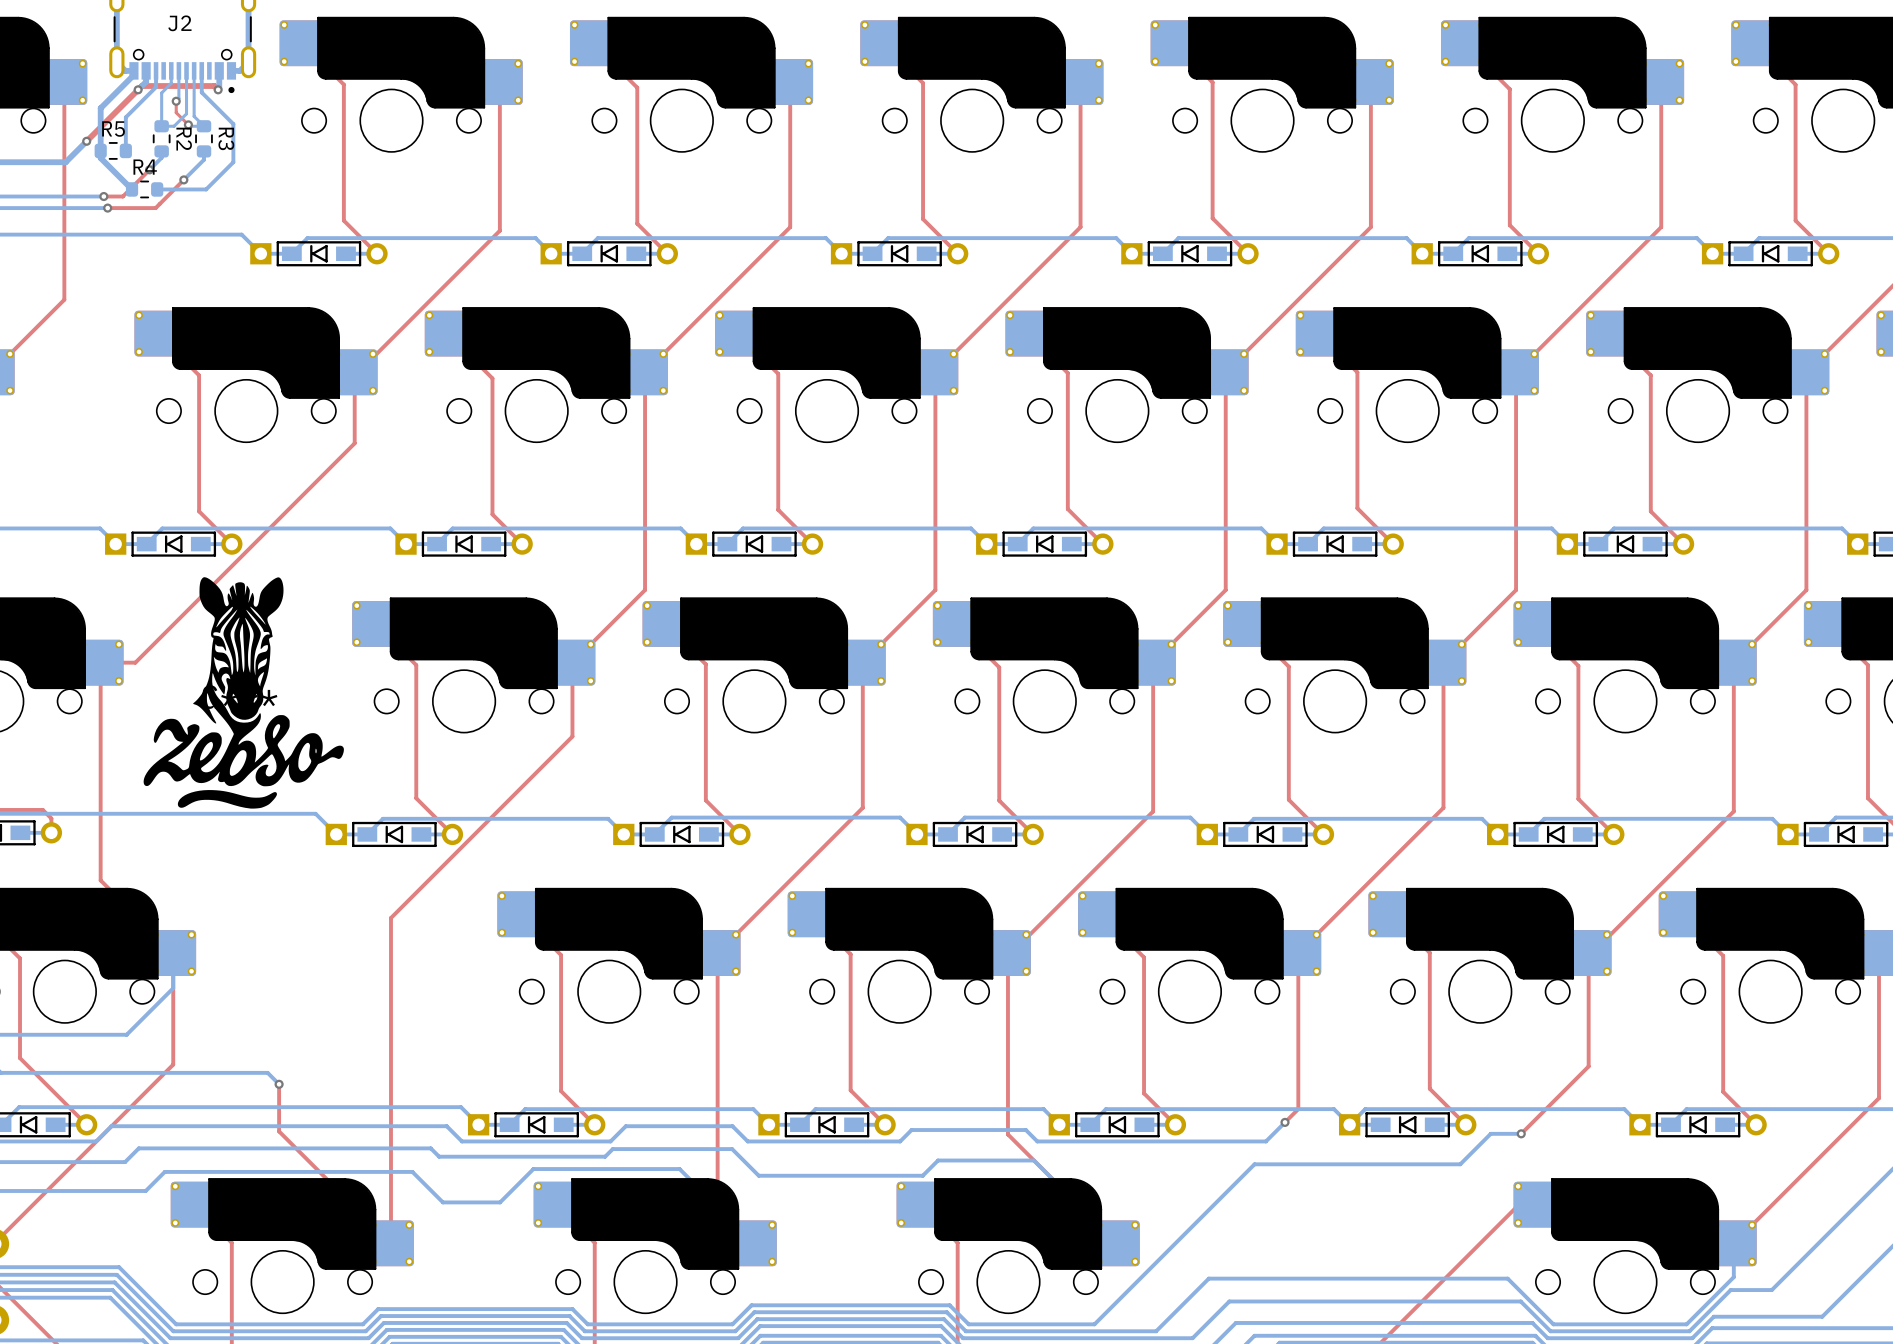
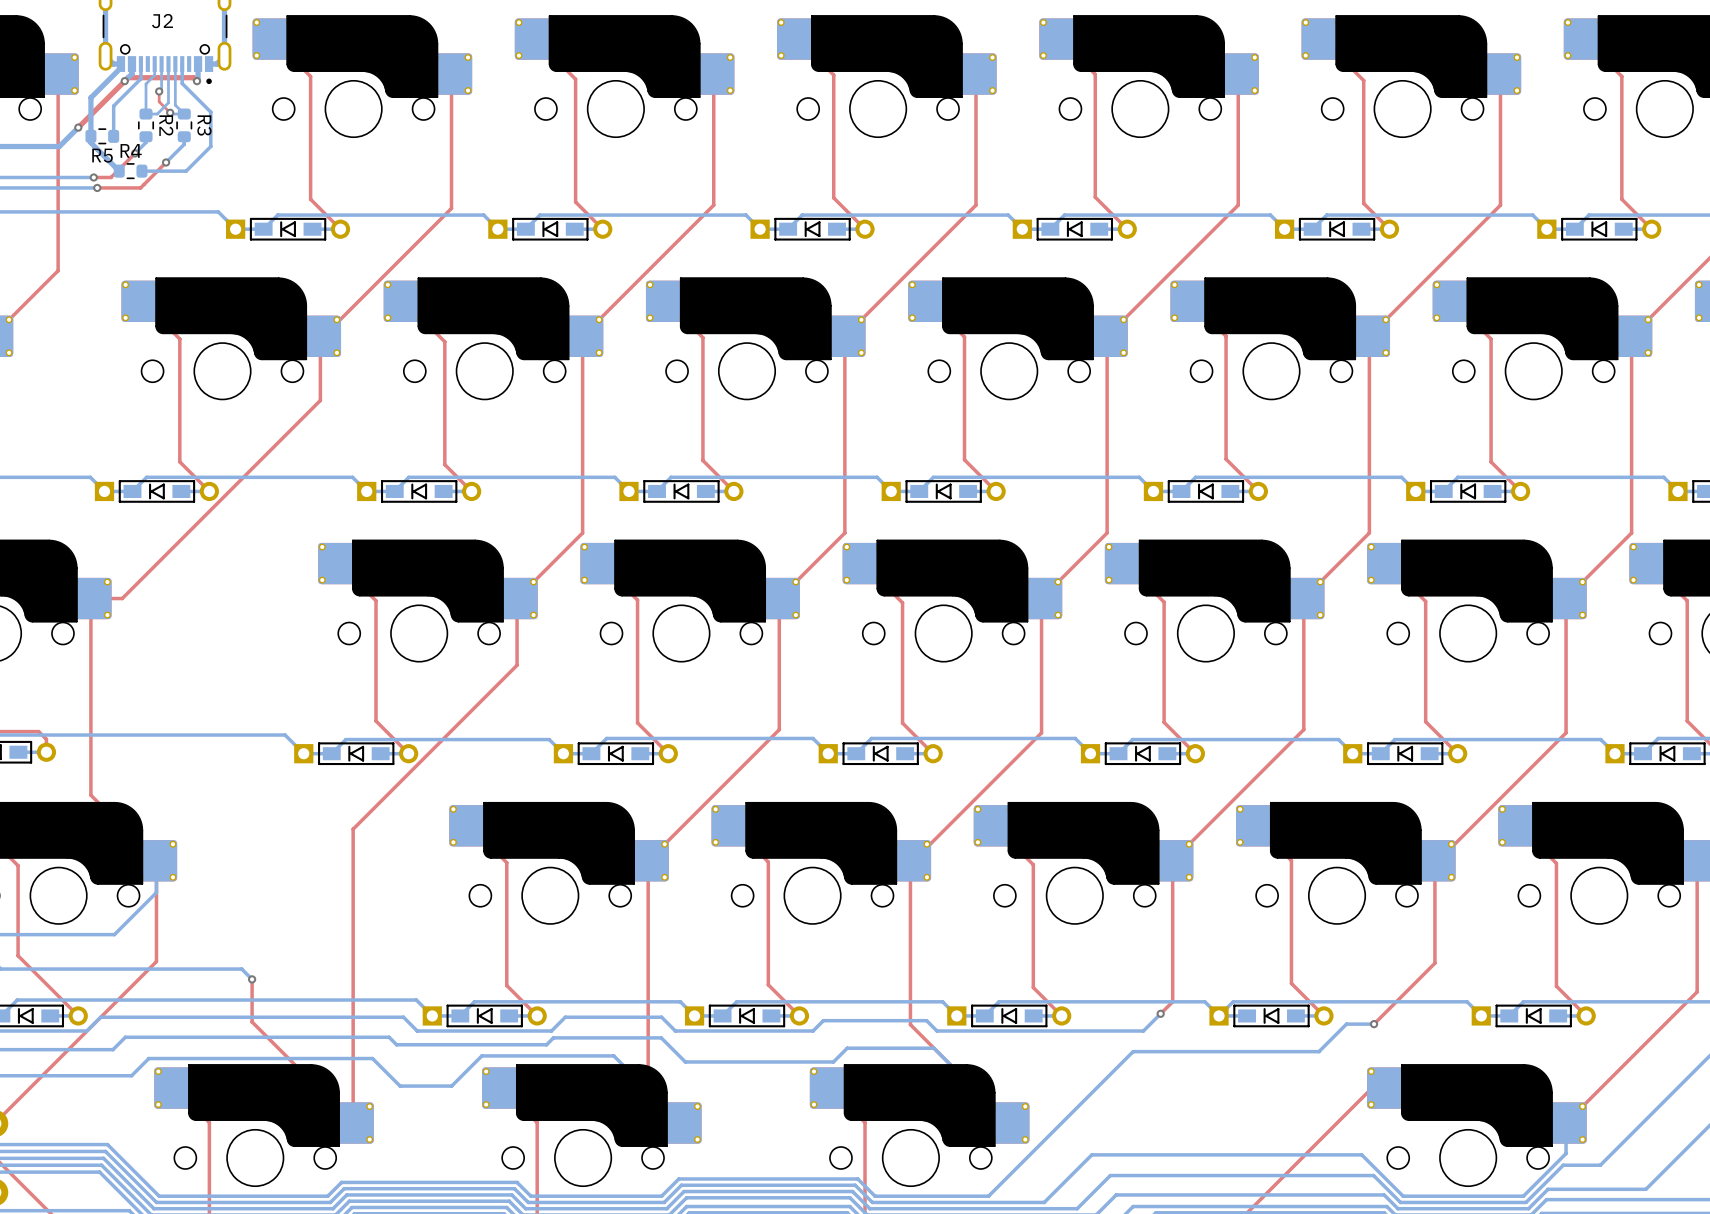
R5 name position: R5 (113, 129) -> R5 (102, 155)
part: (243, 692) -> none

